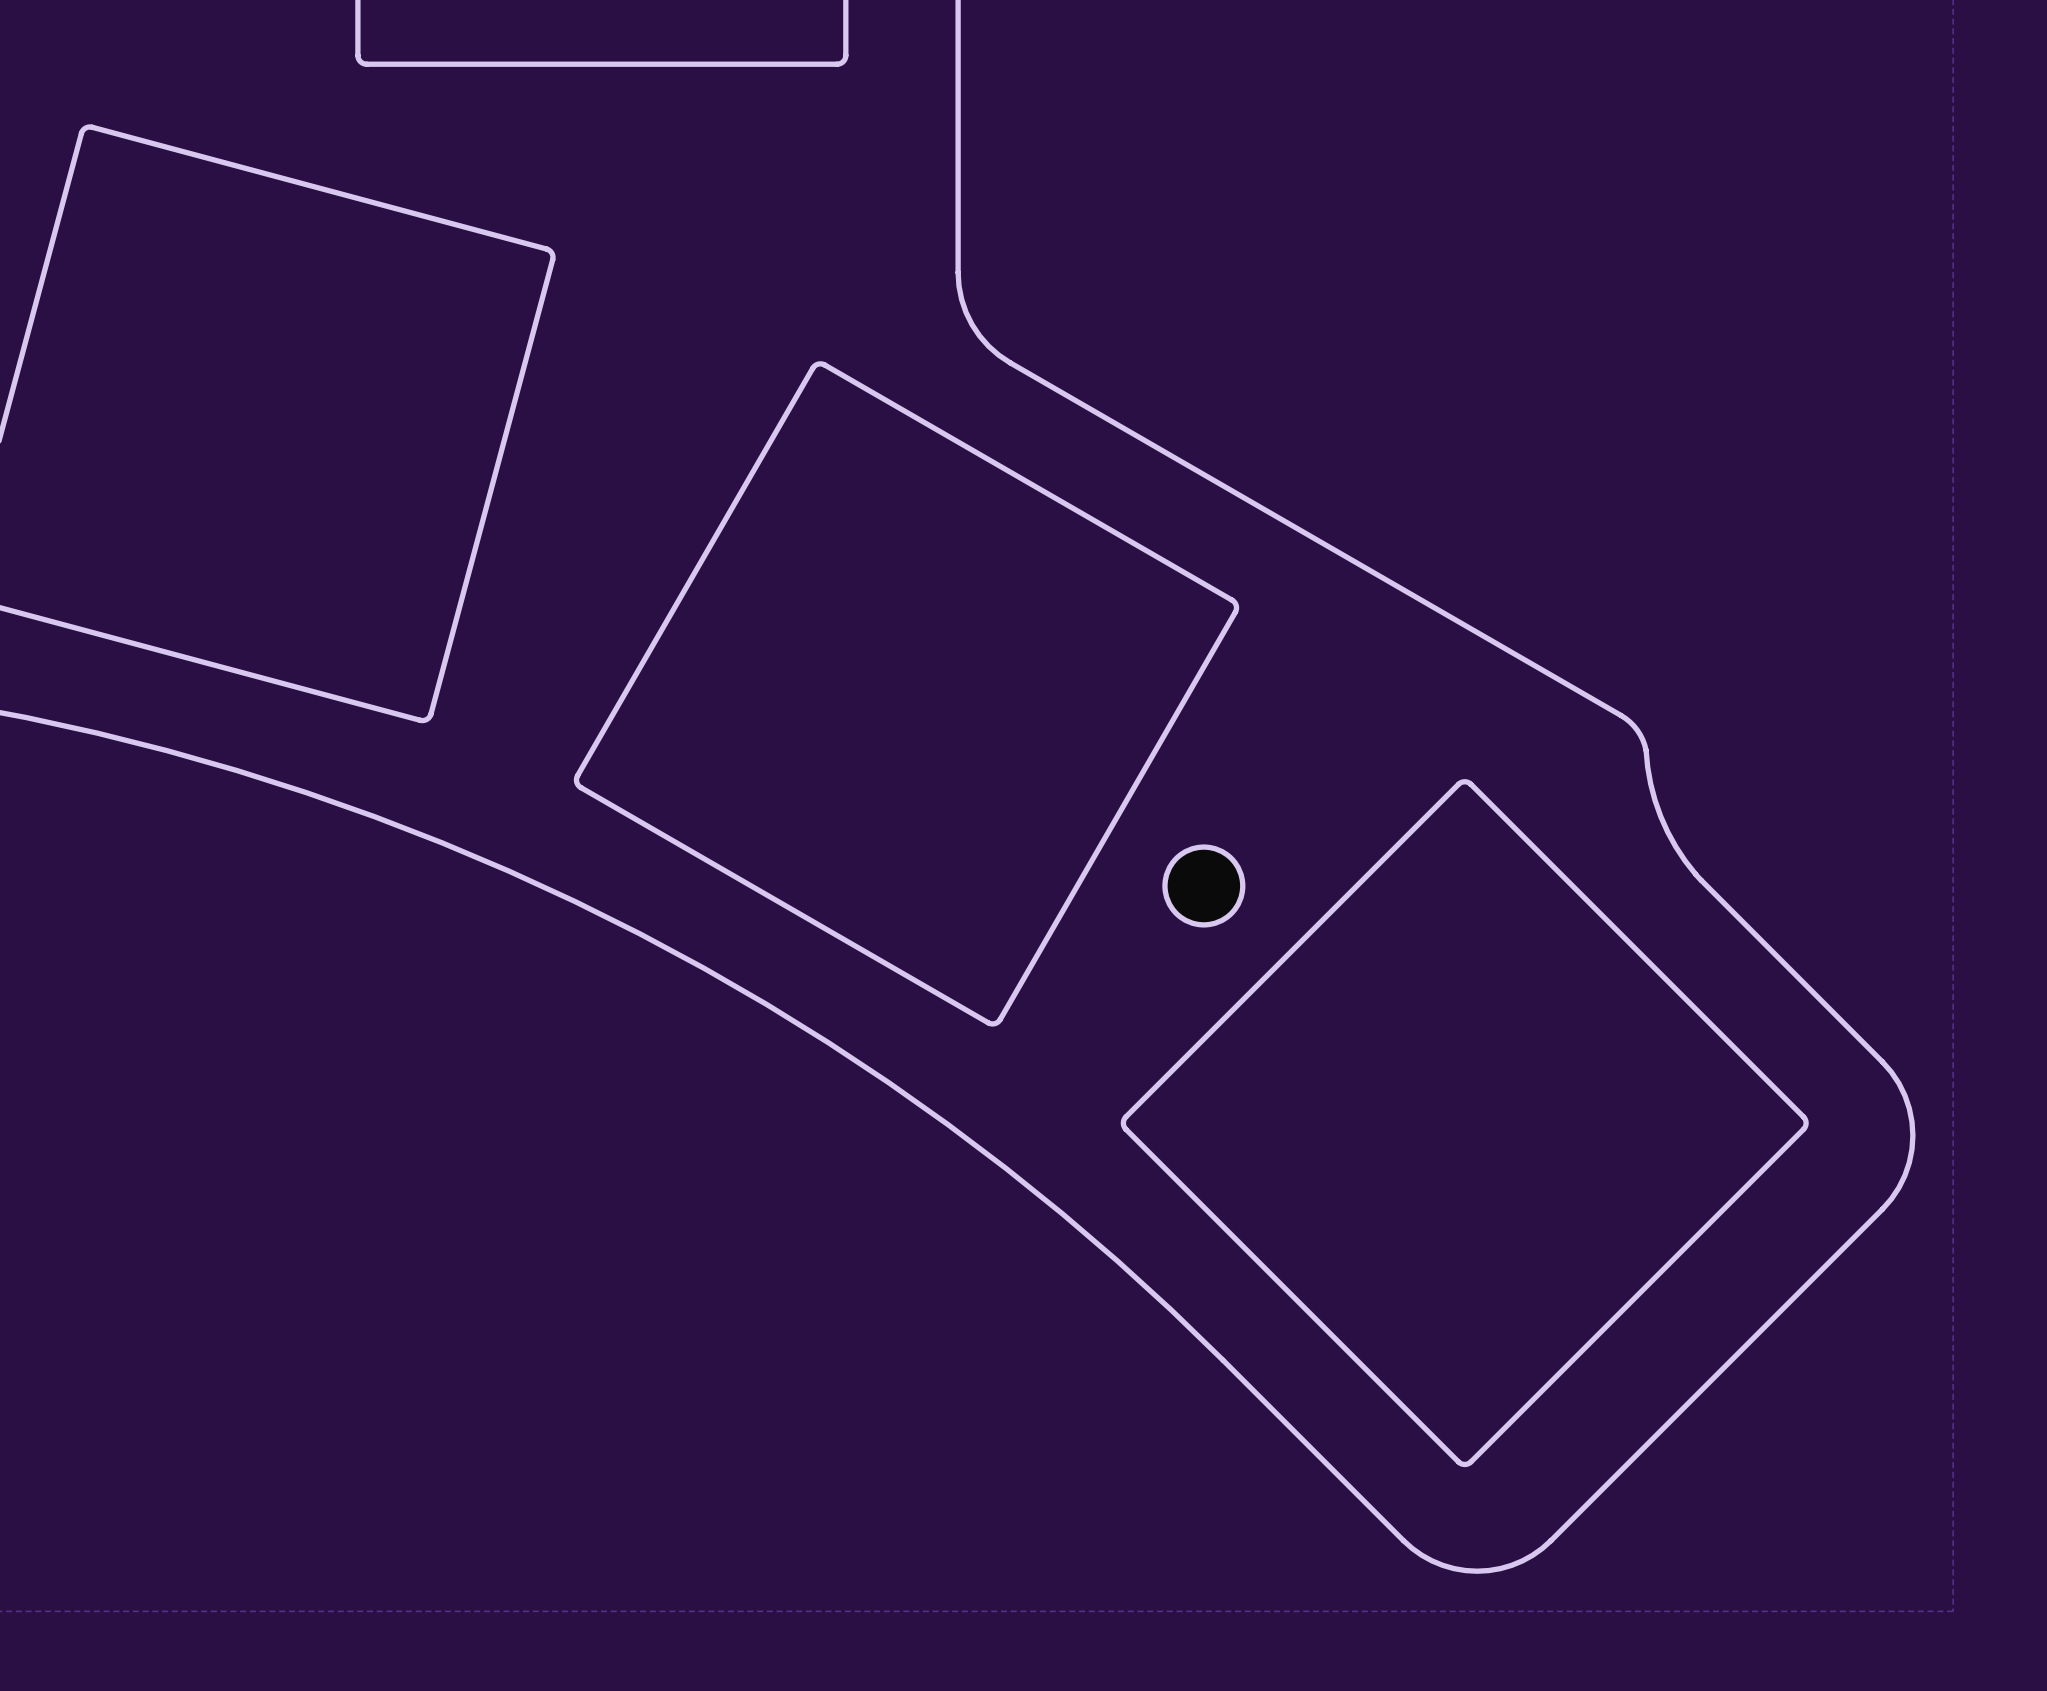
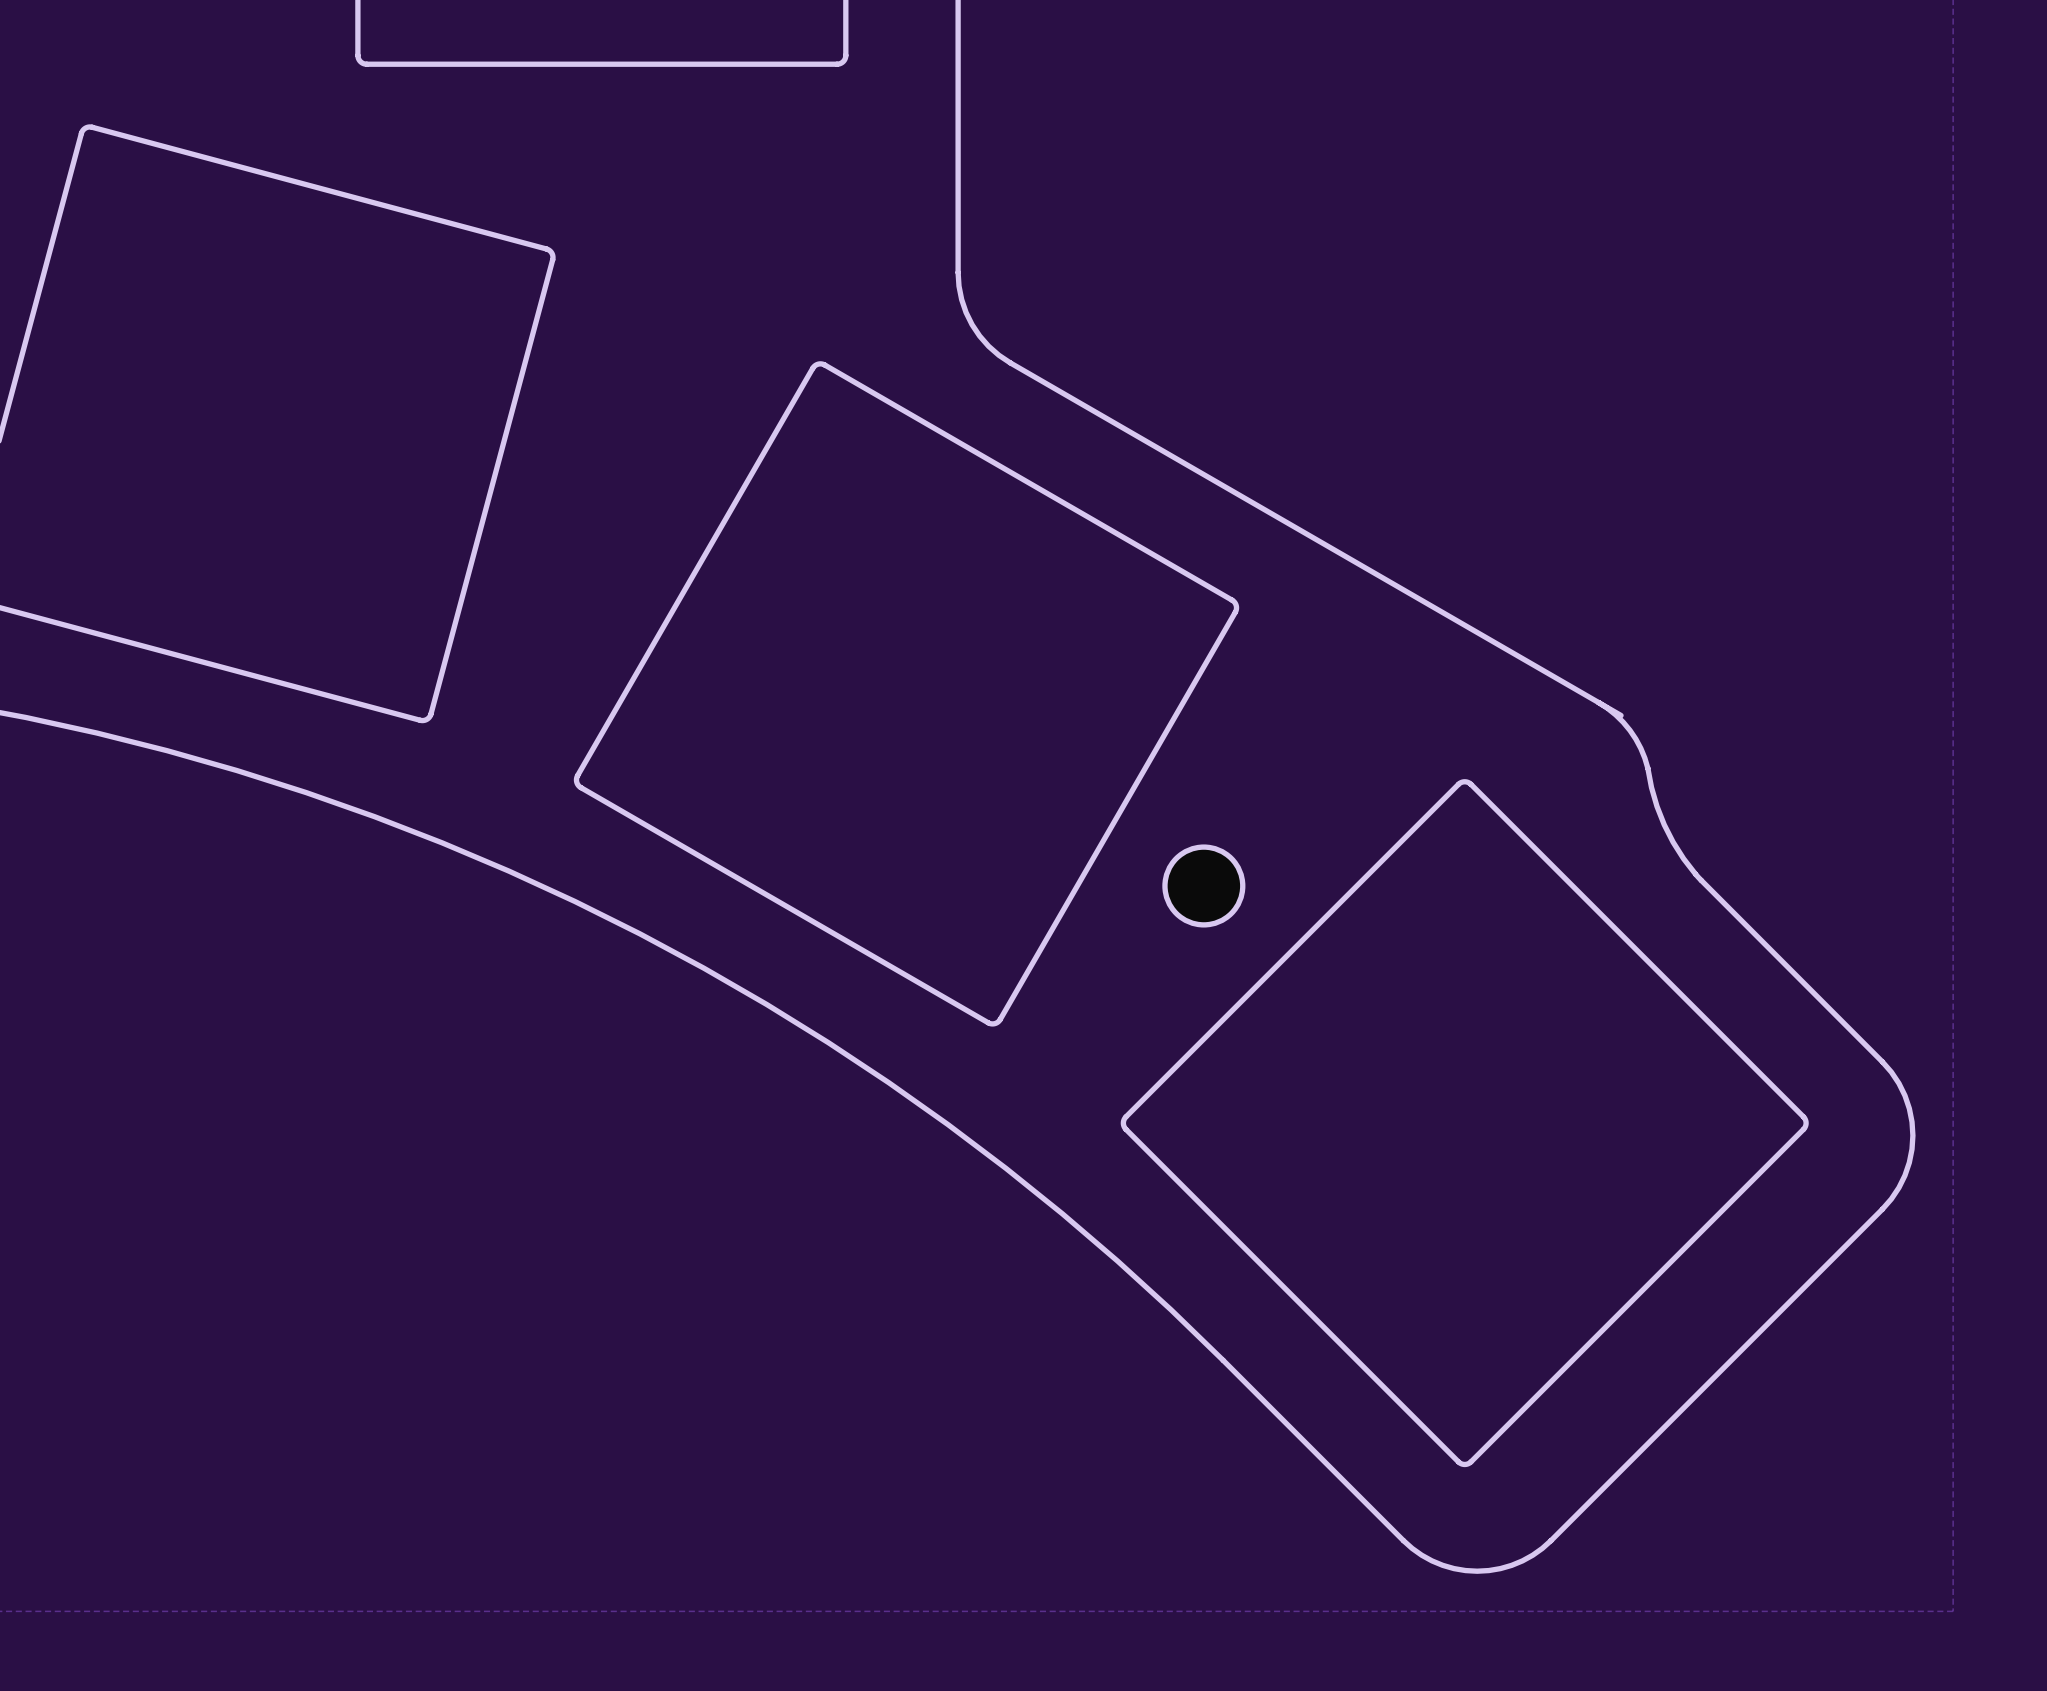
board edge: (1621, 715) (1633, 725) (1642, 739) (1650, 783) (1660, 816) (1675, 846) (1695, 874) -> (1598, 702) (1623, 722) (1635, 739) (1644, 758) (1656, 806) (1664, 824) (1673, 842) (1695, 874)

